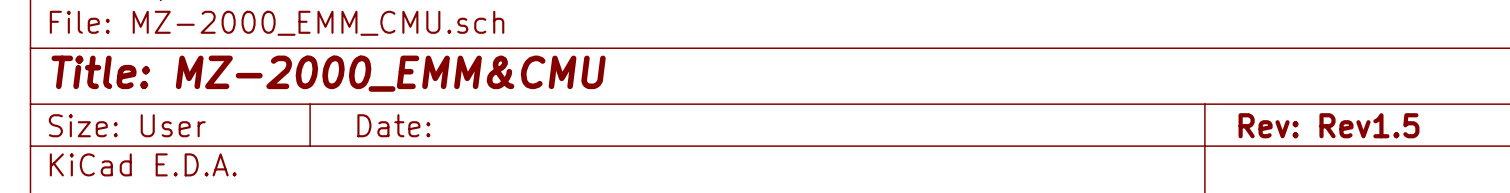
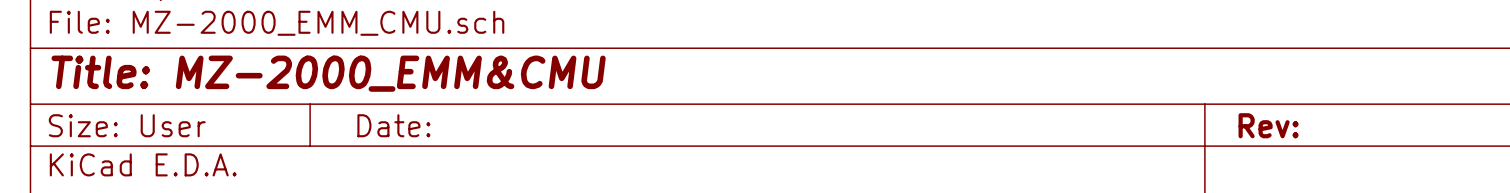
title block: Rev: Rev1.5 (1329, 125) -> Rev: (1268, 125)

